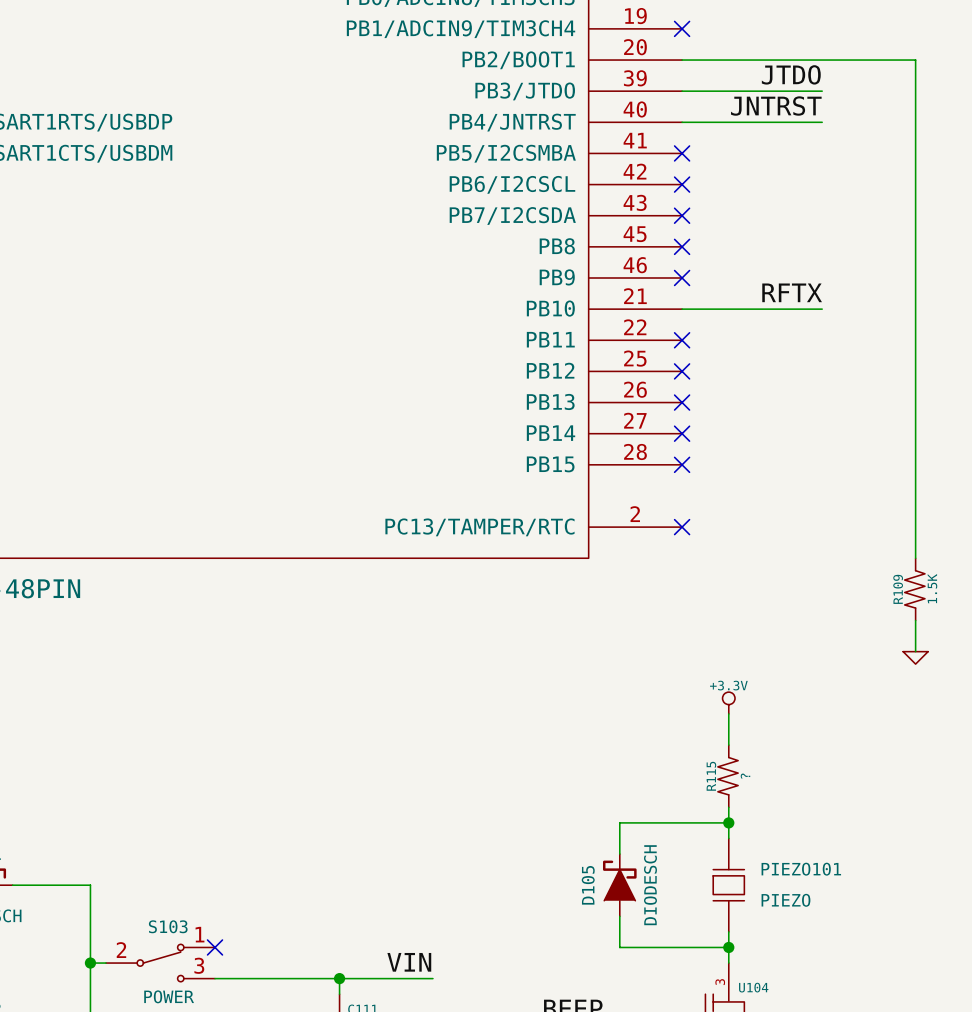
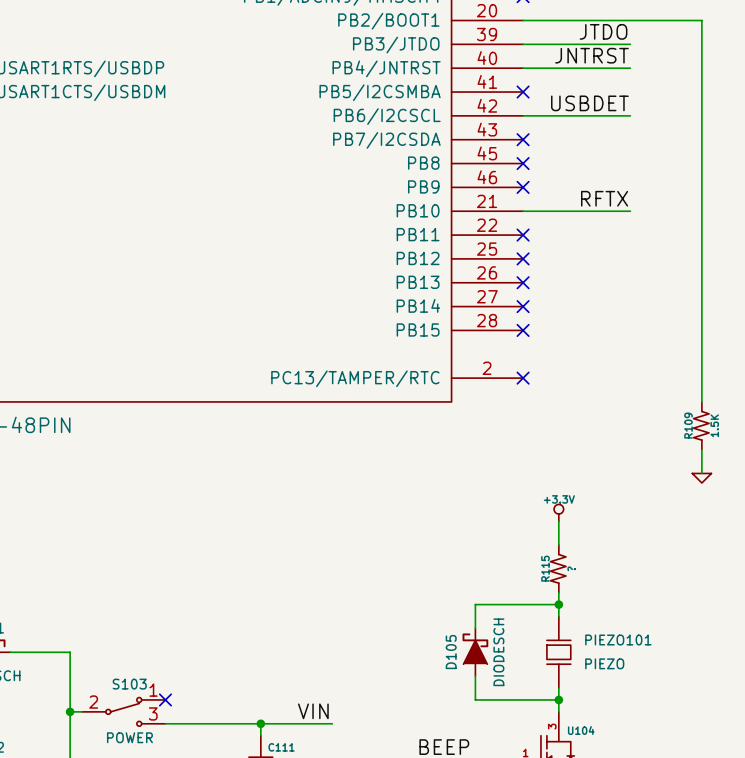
label: none -> USBDET (589, 103)
wire: none -> (523, 115) (630, 115)
no-connect mark: (682, 184) -> none

